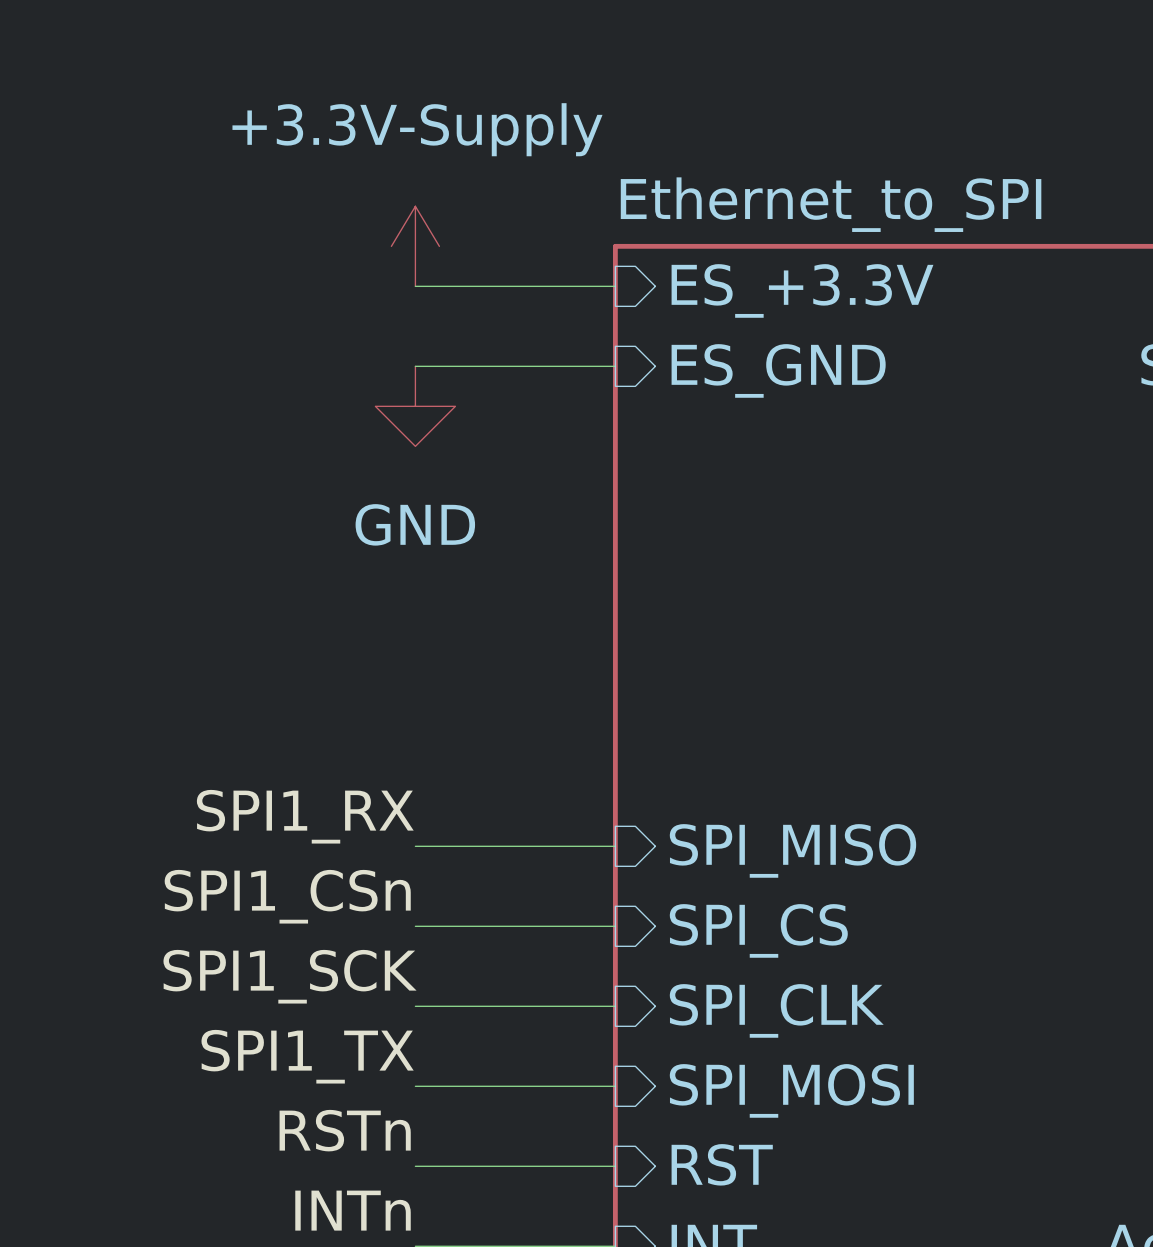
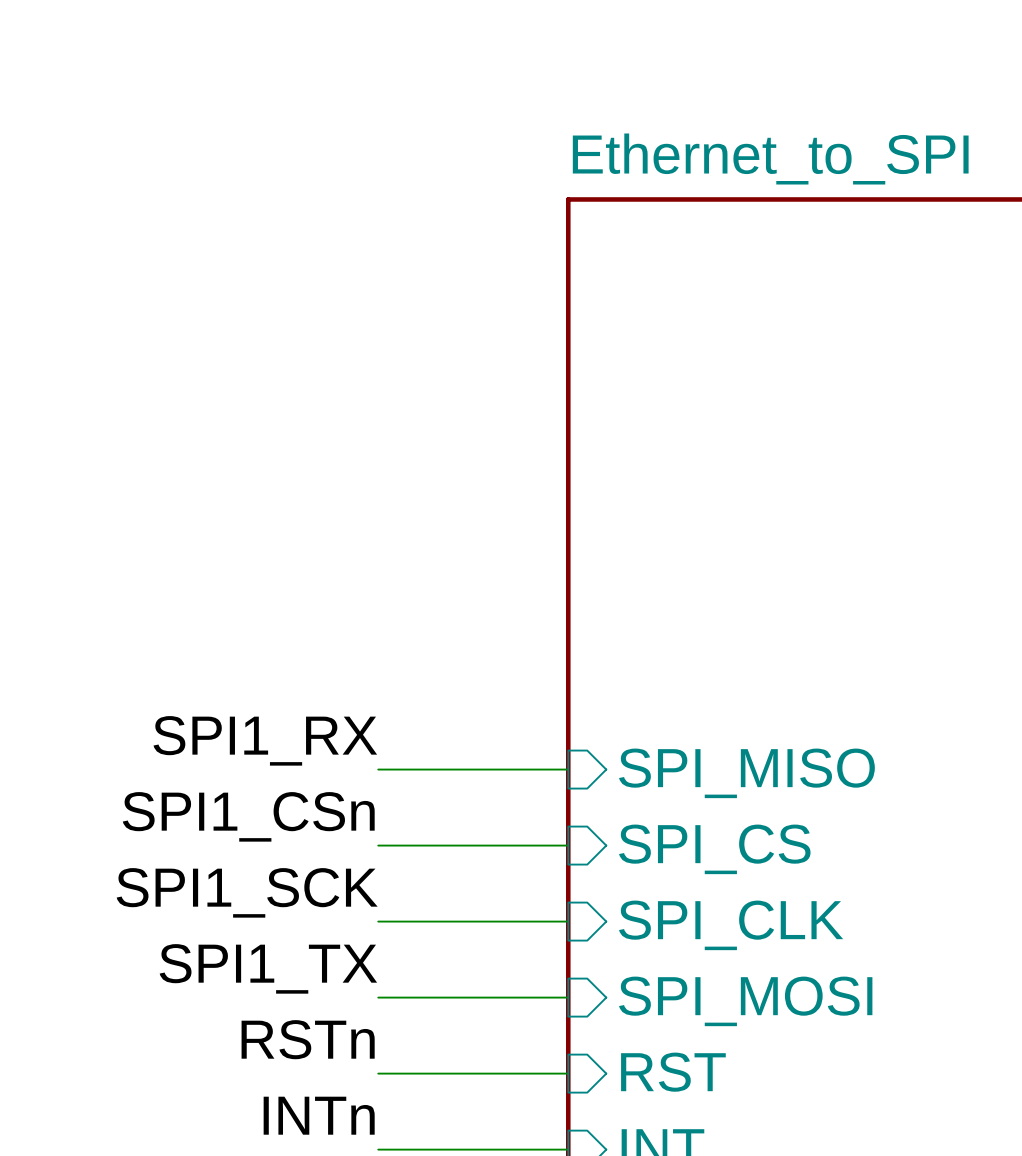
power symbol: +3.3V-Supply (415, 246) -> none
wire: (415, 286) (615, 286) -> none
sheet pin: ES_+3.3V (802, 290) -> none
wire: (415, 366) (615, 366) -> none
sheet pin: ES_GND (778, 370) -> none
power symbol: GND (415, 406) -> none

